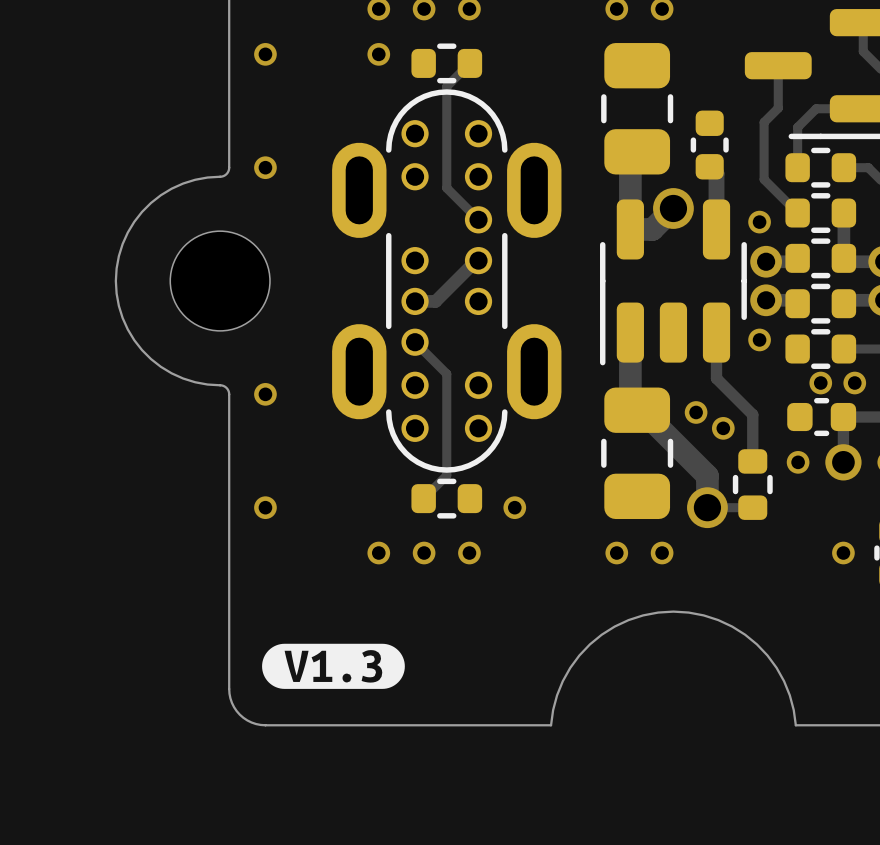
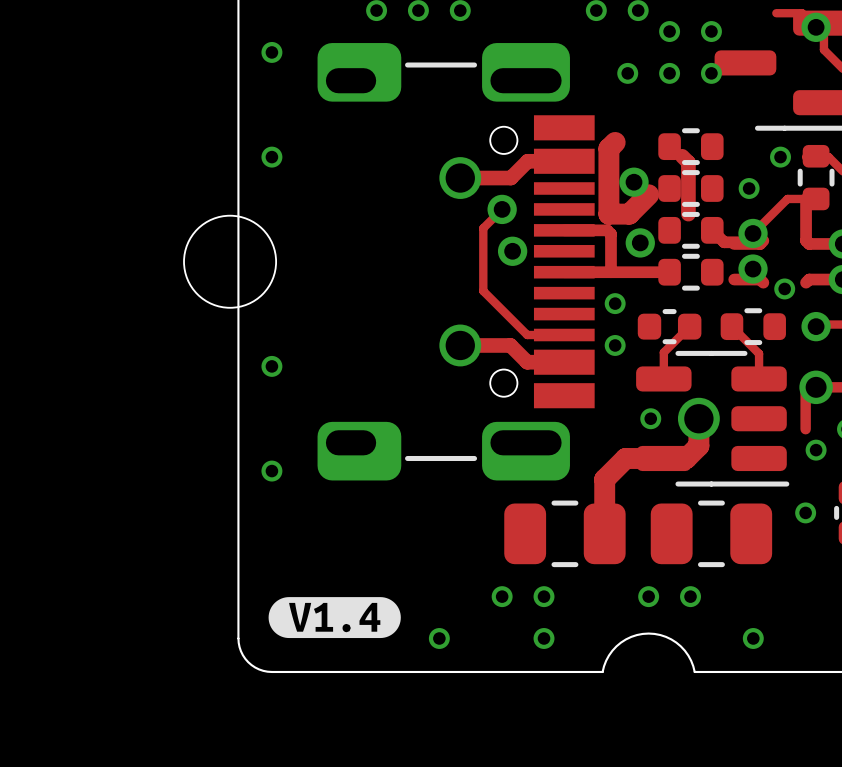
track: none -> (776, 13) (801, 13) (816, 27)
via: none -> (816, 27)
via: none -> (669, 31)
via: none -> (711, 31)
via: (378, 54) -> none
part: (446, 63) -> none
track: (469, 63) (446, 86) (446, 188) (478, 219) -> none
track: (778, 65) (778, 108) (764, 122) (764, 179) (797, 213) -> none
via: none -> (627, 73)
via: none -> (669, 73)
via: none -> (711, 73)
part footprint: [332, 89, 562, 473] -> [317, 43, 595, 481]
part: (637, 108) -> none
track: (863, 108) (816, 108) (797, 127) (797, 167) -> none
part footprint: [690, 110, 729, 180] -> [658, 128, 724, 166]
board edge: (229, 167) (227, 172) (223, 176) (195, 179) (171, 188) (160, 195) (142, 211) (127, 232) (122, 244) (118, 256) (115, 281) (118, 305) (122, 317) (127, 329) (142, 350) (160, 366) (171, 373) (195, 382) (223, 385) (227, 388) (229, 394) -> (238, 157) (238, 366)
via: none -> (780, 157)
part: (820, 167) -> none
track: none -> (564, 161) (527, 161) (510, 178) (460, 178)
part: none -> (816, 177)
via: none -> (460, 178)
part: none -> (690, 188)
via position: (673, 208) -> (634, 182)
part: (820, 213) -> none
track: none -> (816, 198) (787, 198) (744, 242) (724, 242) (712, 230)
via position: (759, 222) -> (749, 188)
track: none -> (502, 209) (483, 228) (483, 291) (527, 335) (564, 335)
via: none -> (502, 209)
track: none -> (564, 230) (607, 230) (610, 234) (610, 272)
part: none -> (690, 230)
via: none -> (753, 233)
part: (820, 258) -> none
track: (478, 260) (435, 301) (415, 301) -> none
via: none -> (640, 242)
via: (766, 261) -> none
via: none -> (512, 251)
part: (673, 282) -> none
via: none -> (753, 269)
track: none -> (564, 272) (669, 272)
part: none -> (690, 272)
via: (766, 300) -> none
part: (820, 303) -> none
via: none -> (784, 288)
via: none -> (615, 303)
track: (630, 332) (630, 398) (707, 475) (707, 507) (752, 507) -> none
track: (716, 332) (716, 378) (752, 414) (752, 461) -> none
via: (759, 339) -> none
track: (415, 342) (446, 373) (446, 475) (423, 498) -> none
part: (820, 349) -> none
track: none -> (689, 326) (663, 352) (663, 378)
track: none -> (731, 326) (759, 353) (759, 378)
part: none -> (753, 326)
via: none -> (816, 326)
track: none -> (460, 345) (510, 345) (527, 362) (564, 362)
via: none -> (460, 345)
via: none -> (615, 345)
via: (820, 383) -> none
via: (854, 383) -> none
via: (696, 412) -> none
via size: [711, 417, 735, 440] -> [677, 397, 720, 440]
part position: (821, 417) -> (669, 326)
part footprint: [732, 449, 773, 520] -> [636, 350, 790, 487]
via: none -> (650, 418)
track: none -> (698, 418) (698, 445) (686, 458) (625, 458) (604, 479) (604, 533)
part: (637, 453) -> none
via: (798, 462) -> none
via position: (843, 462) -> (816, 387)
via: none -> (816, 450)
part: (446, 498) -> none
via: (514, 507) -> none
via: (707, 507) -> none
via: (378, 553) -> none
via: (424, 553) -> none
via: (469, 553) -> none
via: (616, 553) -> none
via: (662, 553) -> none
part: none -> (564, 533)
part: none -> (711, 533)
drawing shape: [262, 643, 405, 689] -> [268, 597, 401, 639]
via: none -> (502, 596)
via: none -> (544, 596)
via: none -> (648, 596)
via: none -> (690, 596)
via: none -> (439, 638)
via: none -> (544, 638)
via: none -> (753, 638)
board edge: (551, 725) (557, 695) (562, 681) (579, 655) (589, 644) (601, 634) (628, 620) (658, 612) (673, 611) (688, 612) (718, 620) (745, 634) (756, 644) (767, 655) (784, 681) (793, 710) (795, 725) -> (535, 671) (602, 671) (608, 655) (621, 642) (636, 635) (648, 633) (660, 635) (676, 642) (688, 655) (694, 671) (761, 671)

